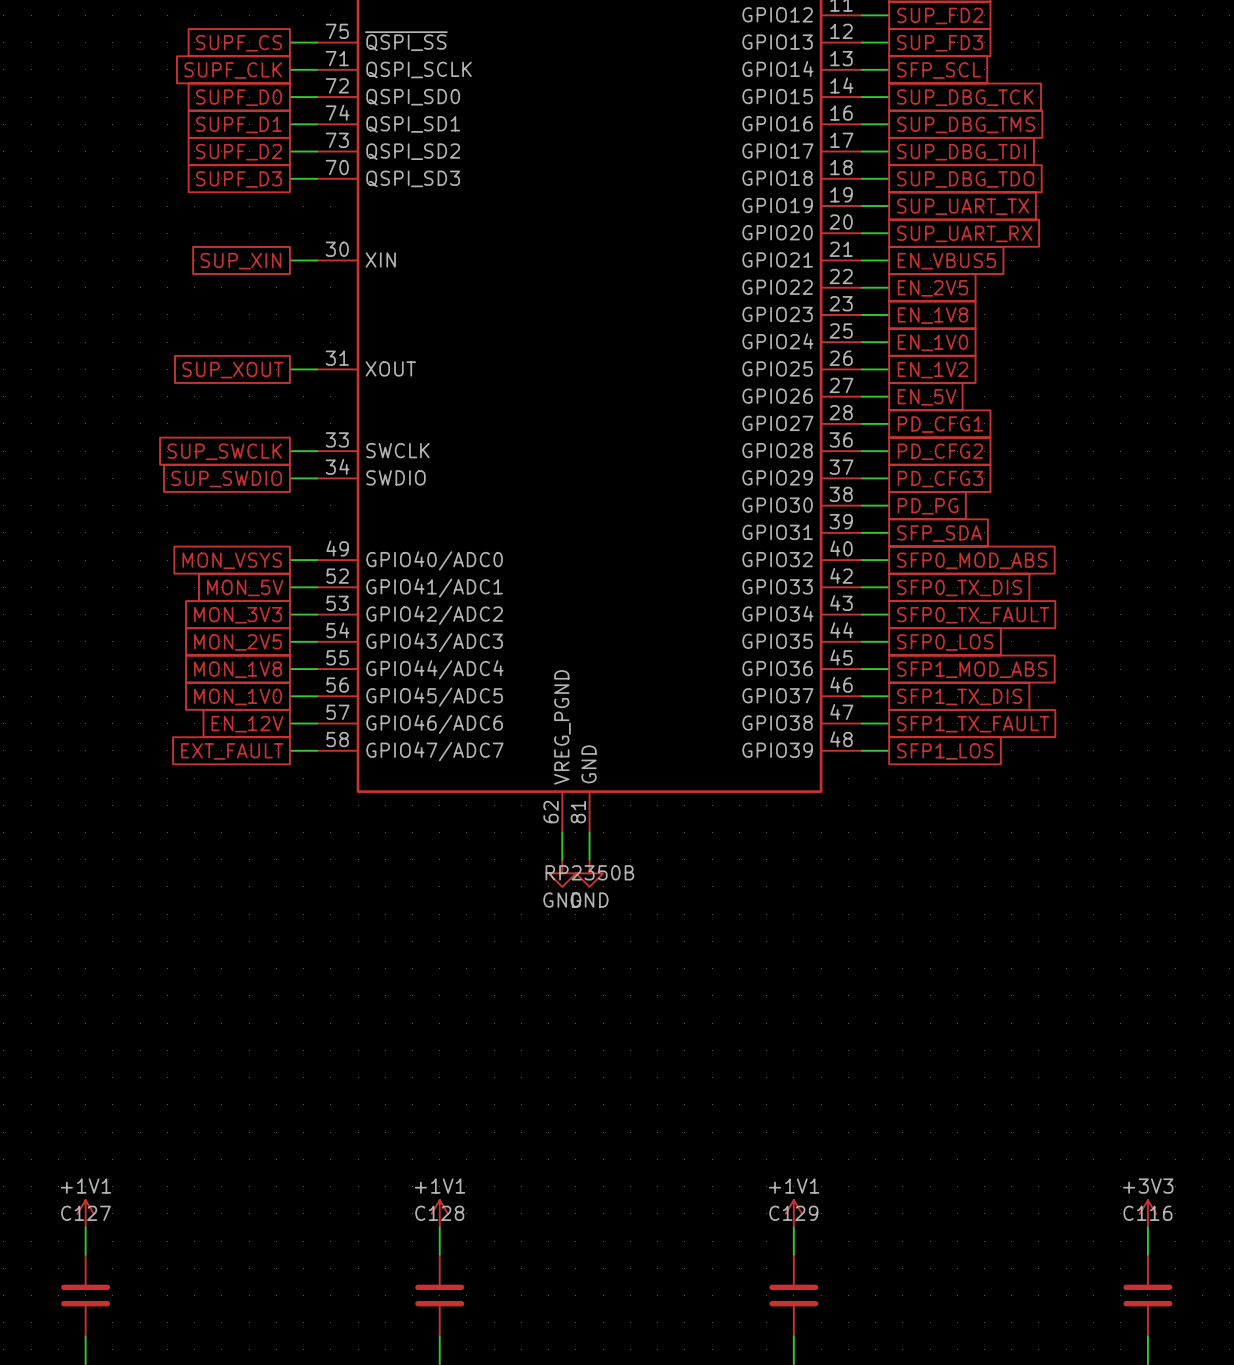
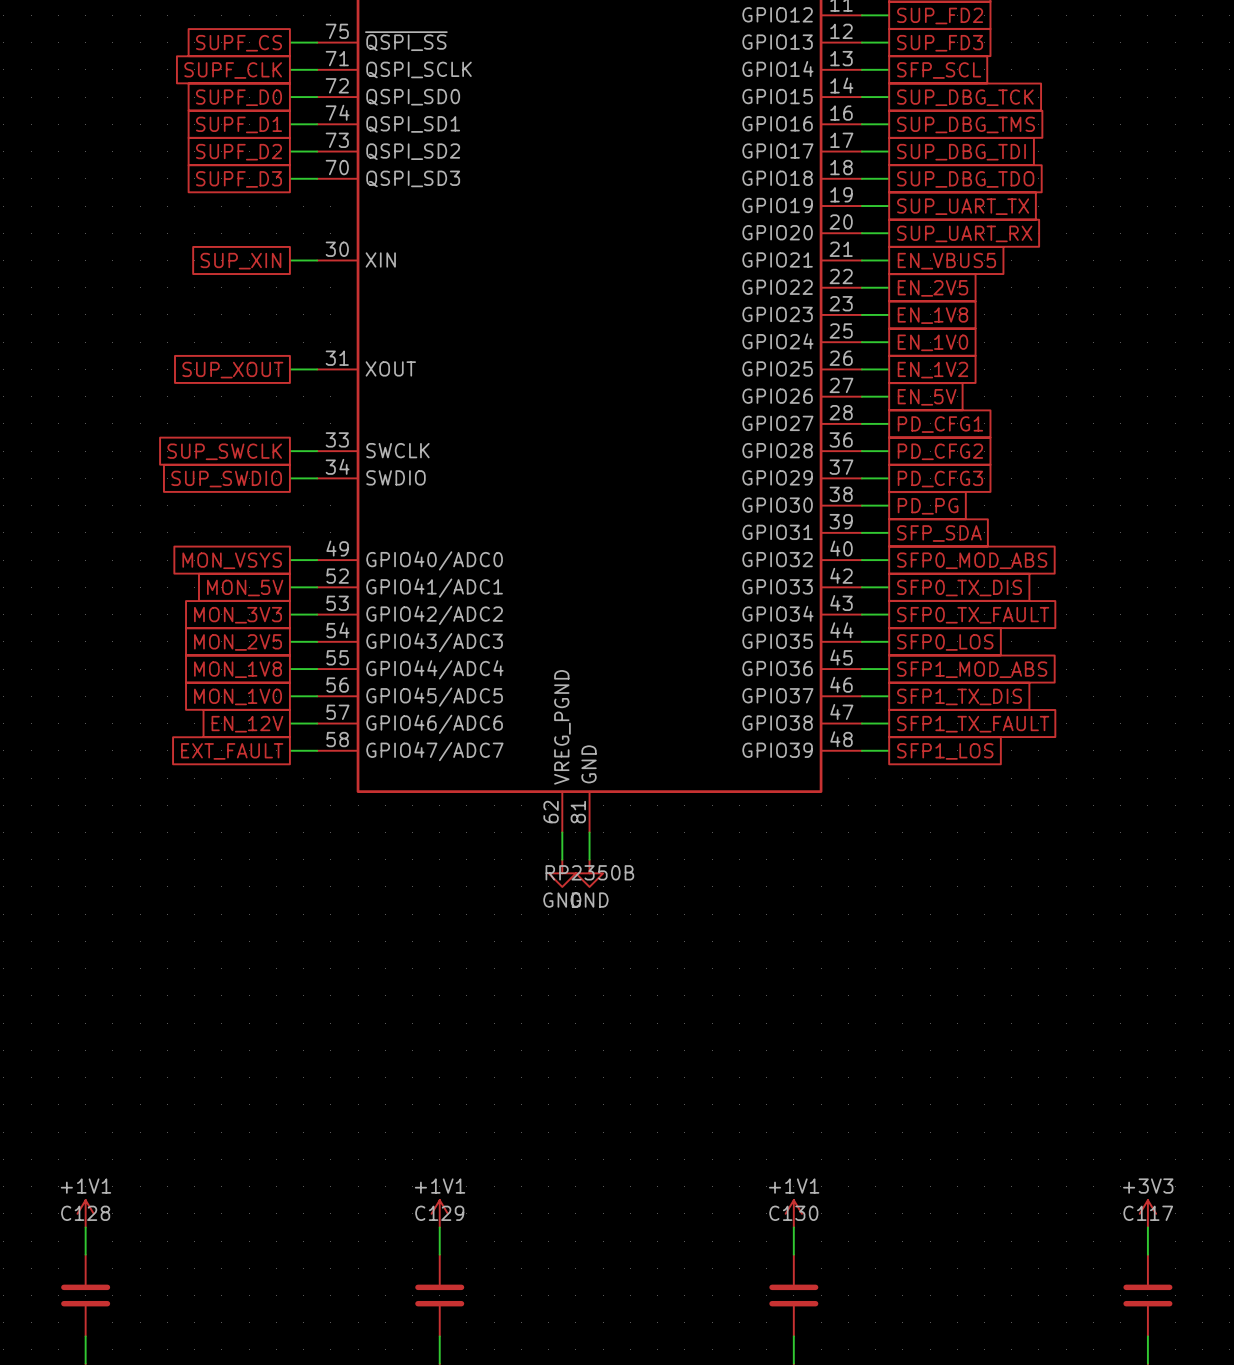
C127 name: C127 (85, 1213) -> C128 (85, 1213)
C128 name: C128 (439, 1213) -> C129 (439, 1213)
C129 name: C129 (793, 1213) -> C130 (793, 1213)
C116 name: C116 (1147, 1213) -> C117 (1148, 1213)

